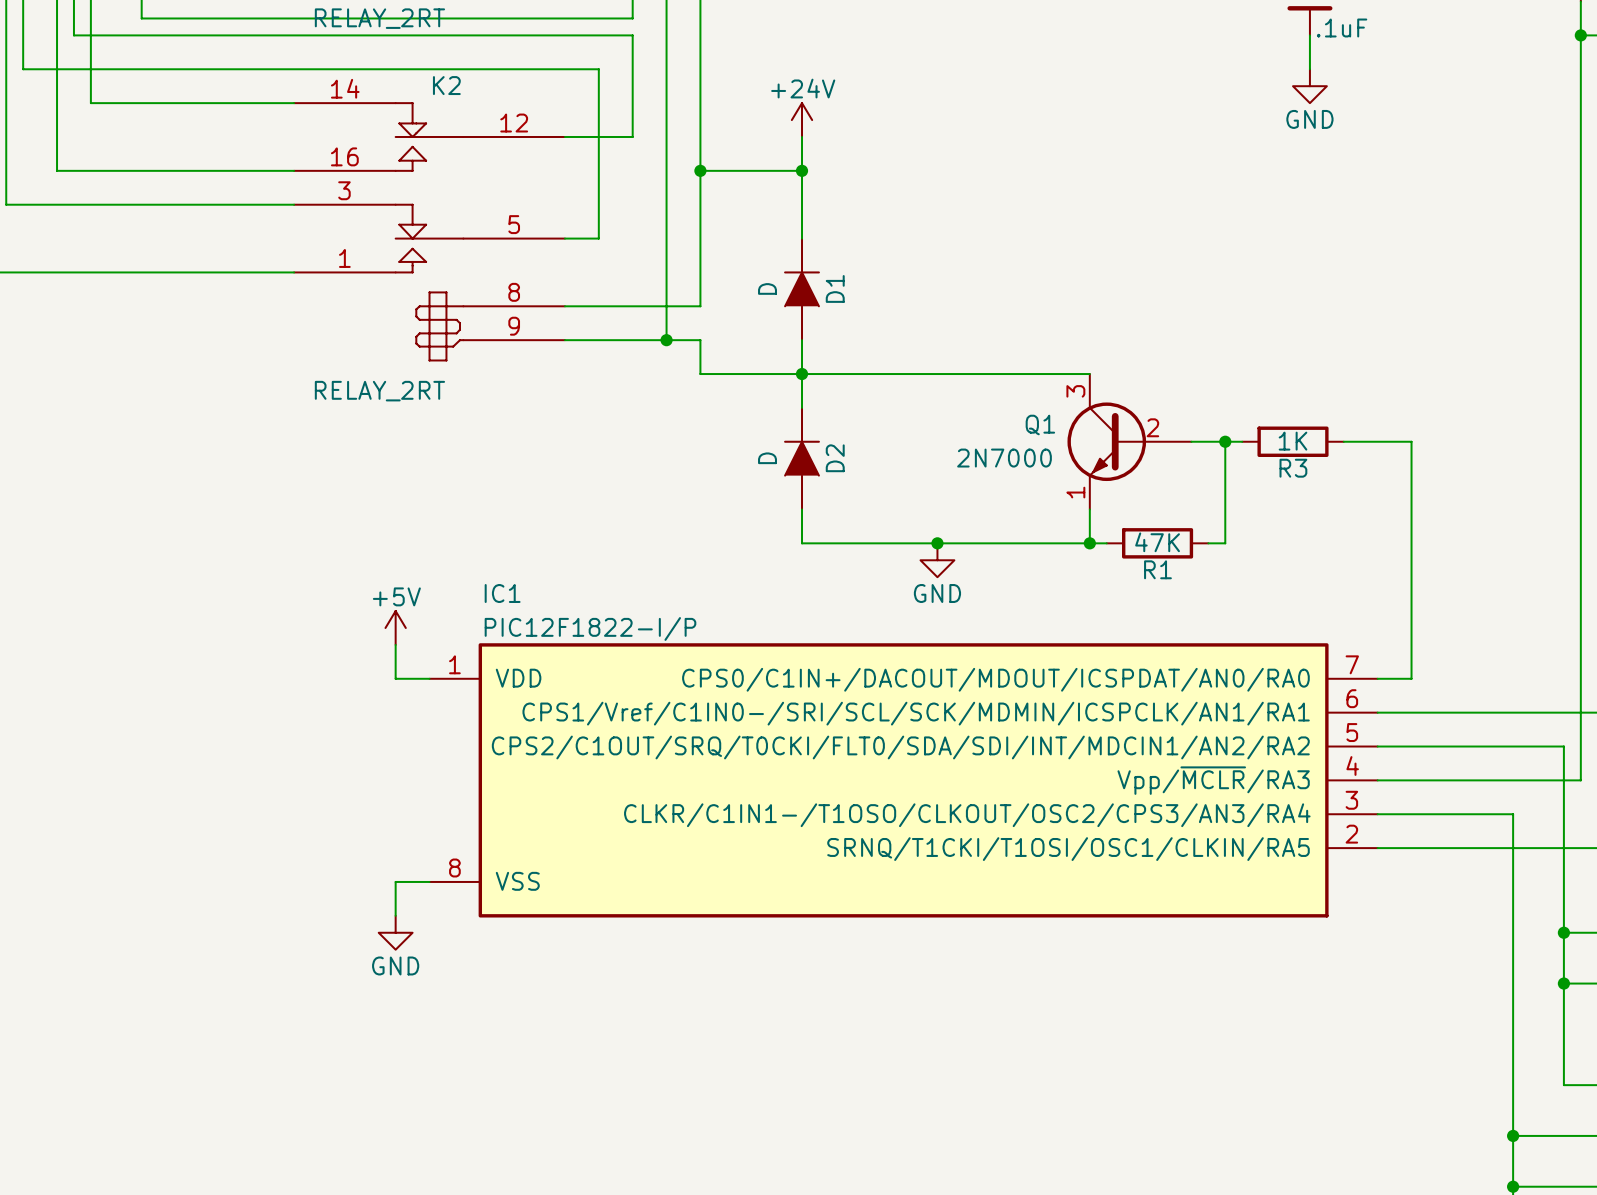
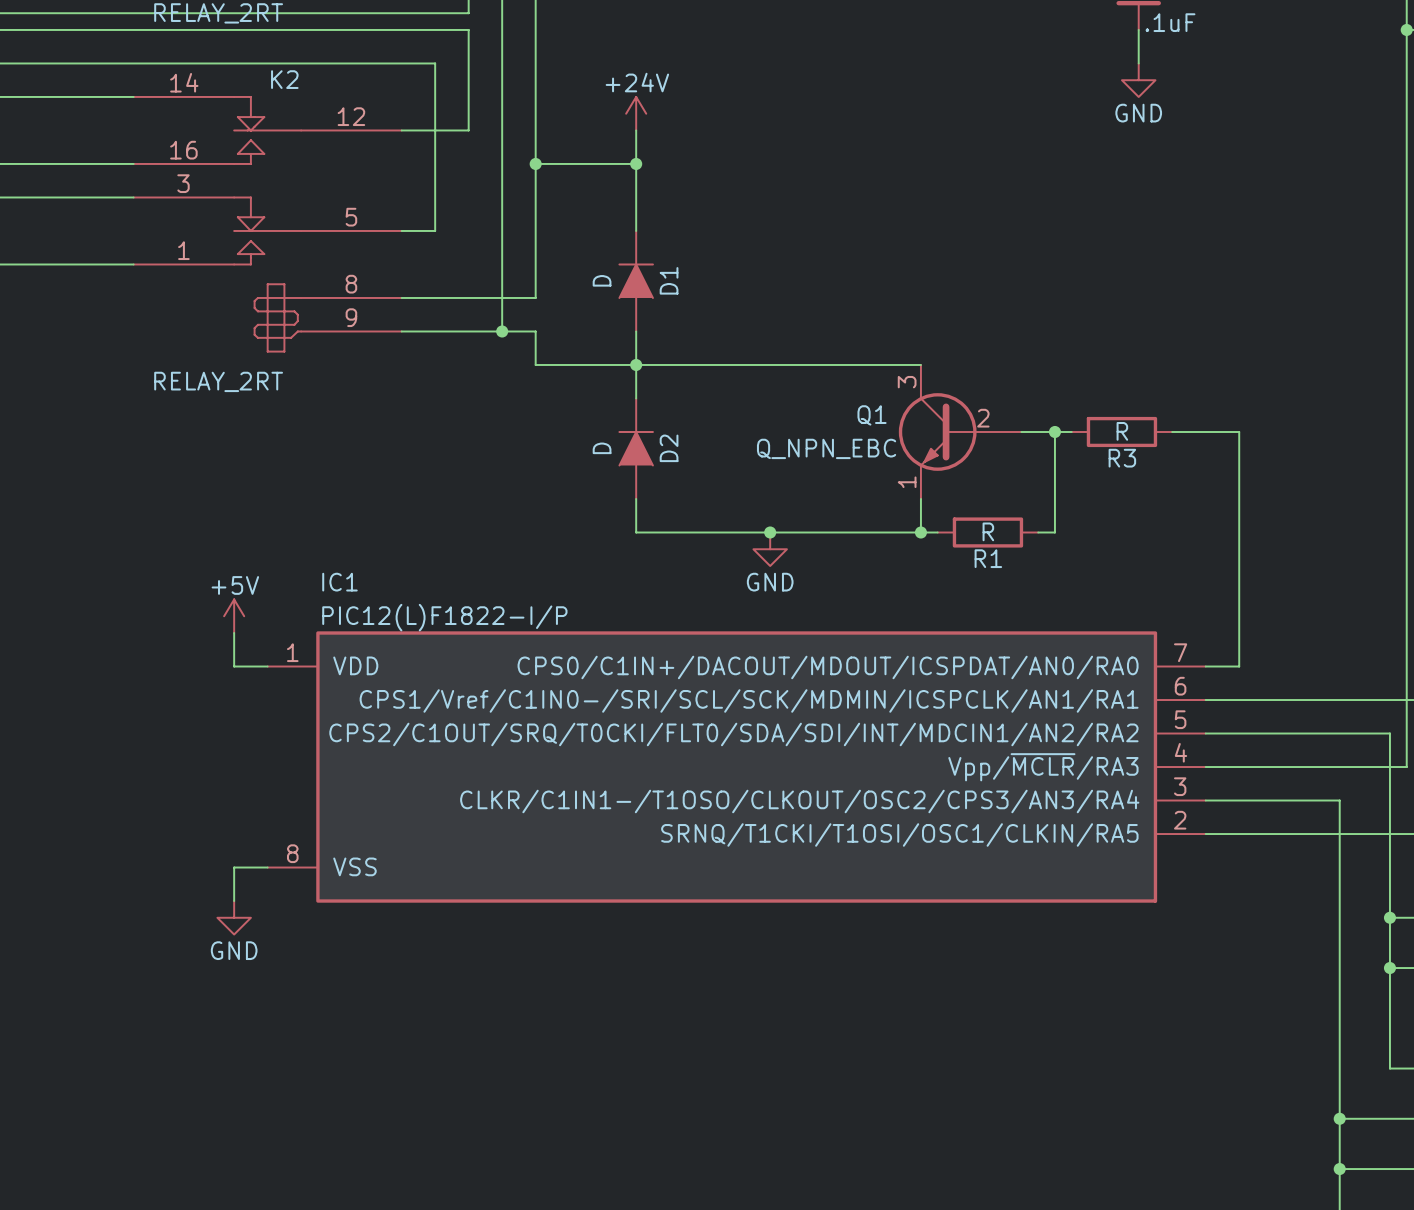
R3 value: 1K (1293, 441) -> R (1122, 431)
Q1 value: 2N7000 (1004, 458) -> Q_NPN_EBC (826, 448)
R1 value: 47K (1157, 542) -> R (988, 531)
IC1 value: PIC12F1822-I/P (590, 628) -> PIC12(L)F1822-I/P (444, 617)

